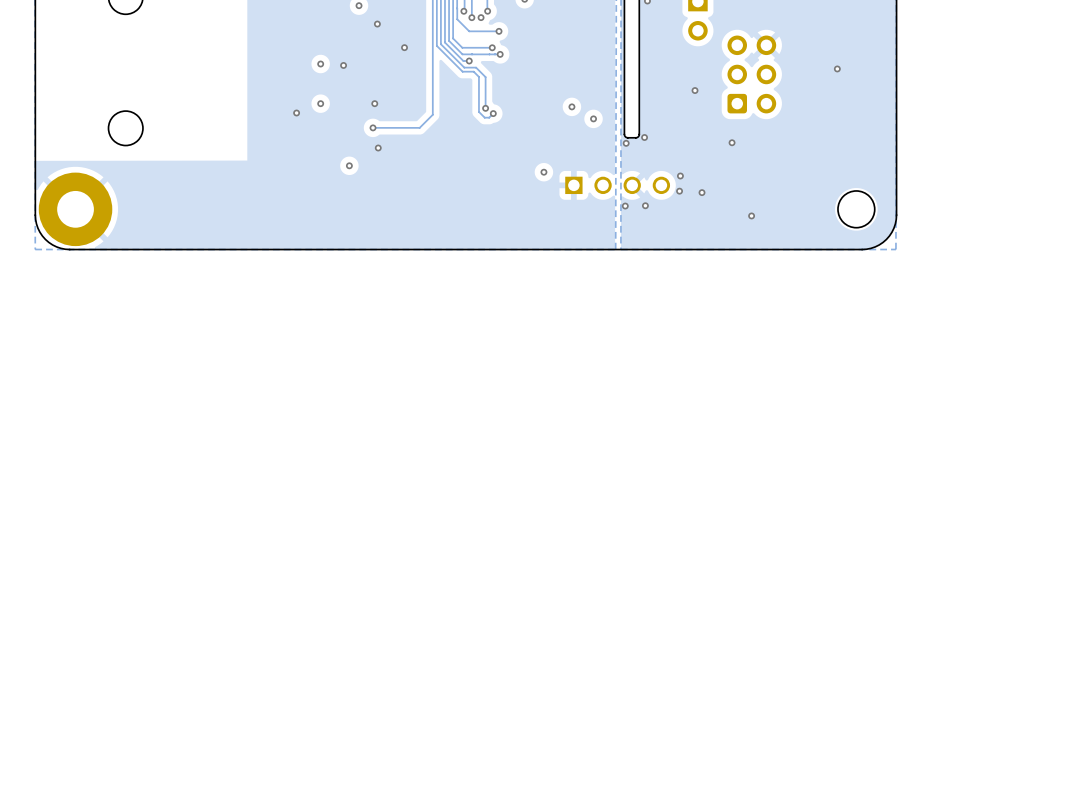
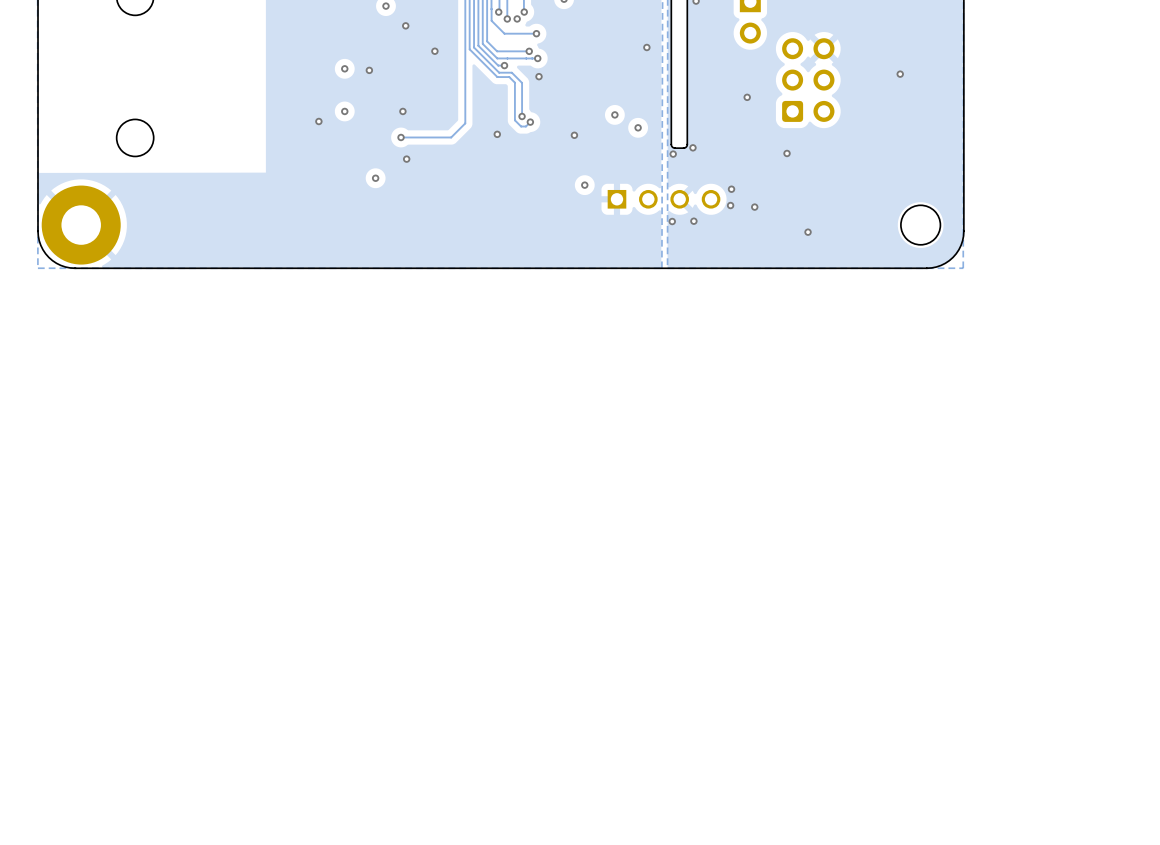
via: none -> (646, 47)
via: none -> (538, 76)
via: none -> (497, 134)
via: none -> (574, 135)

